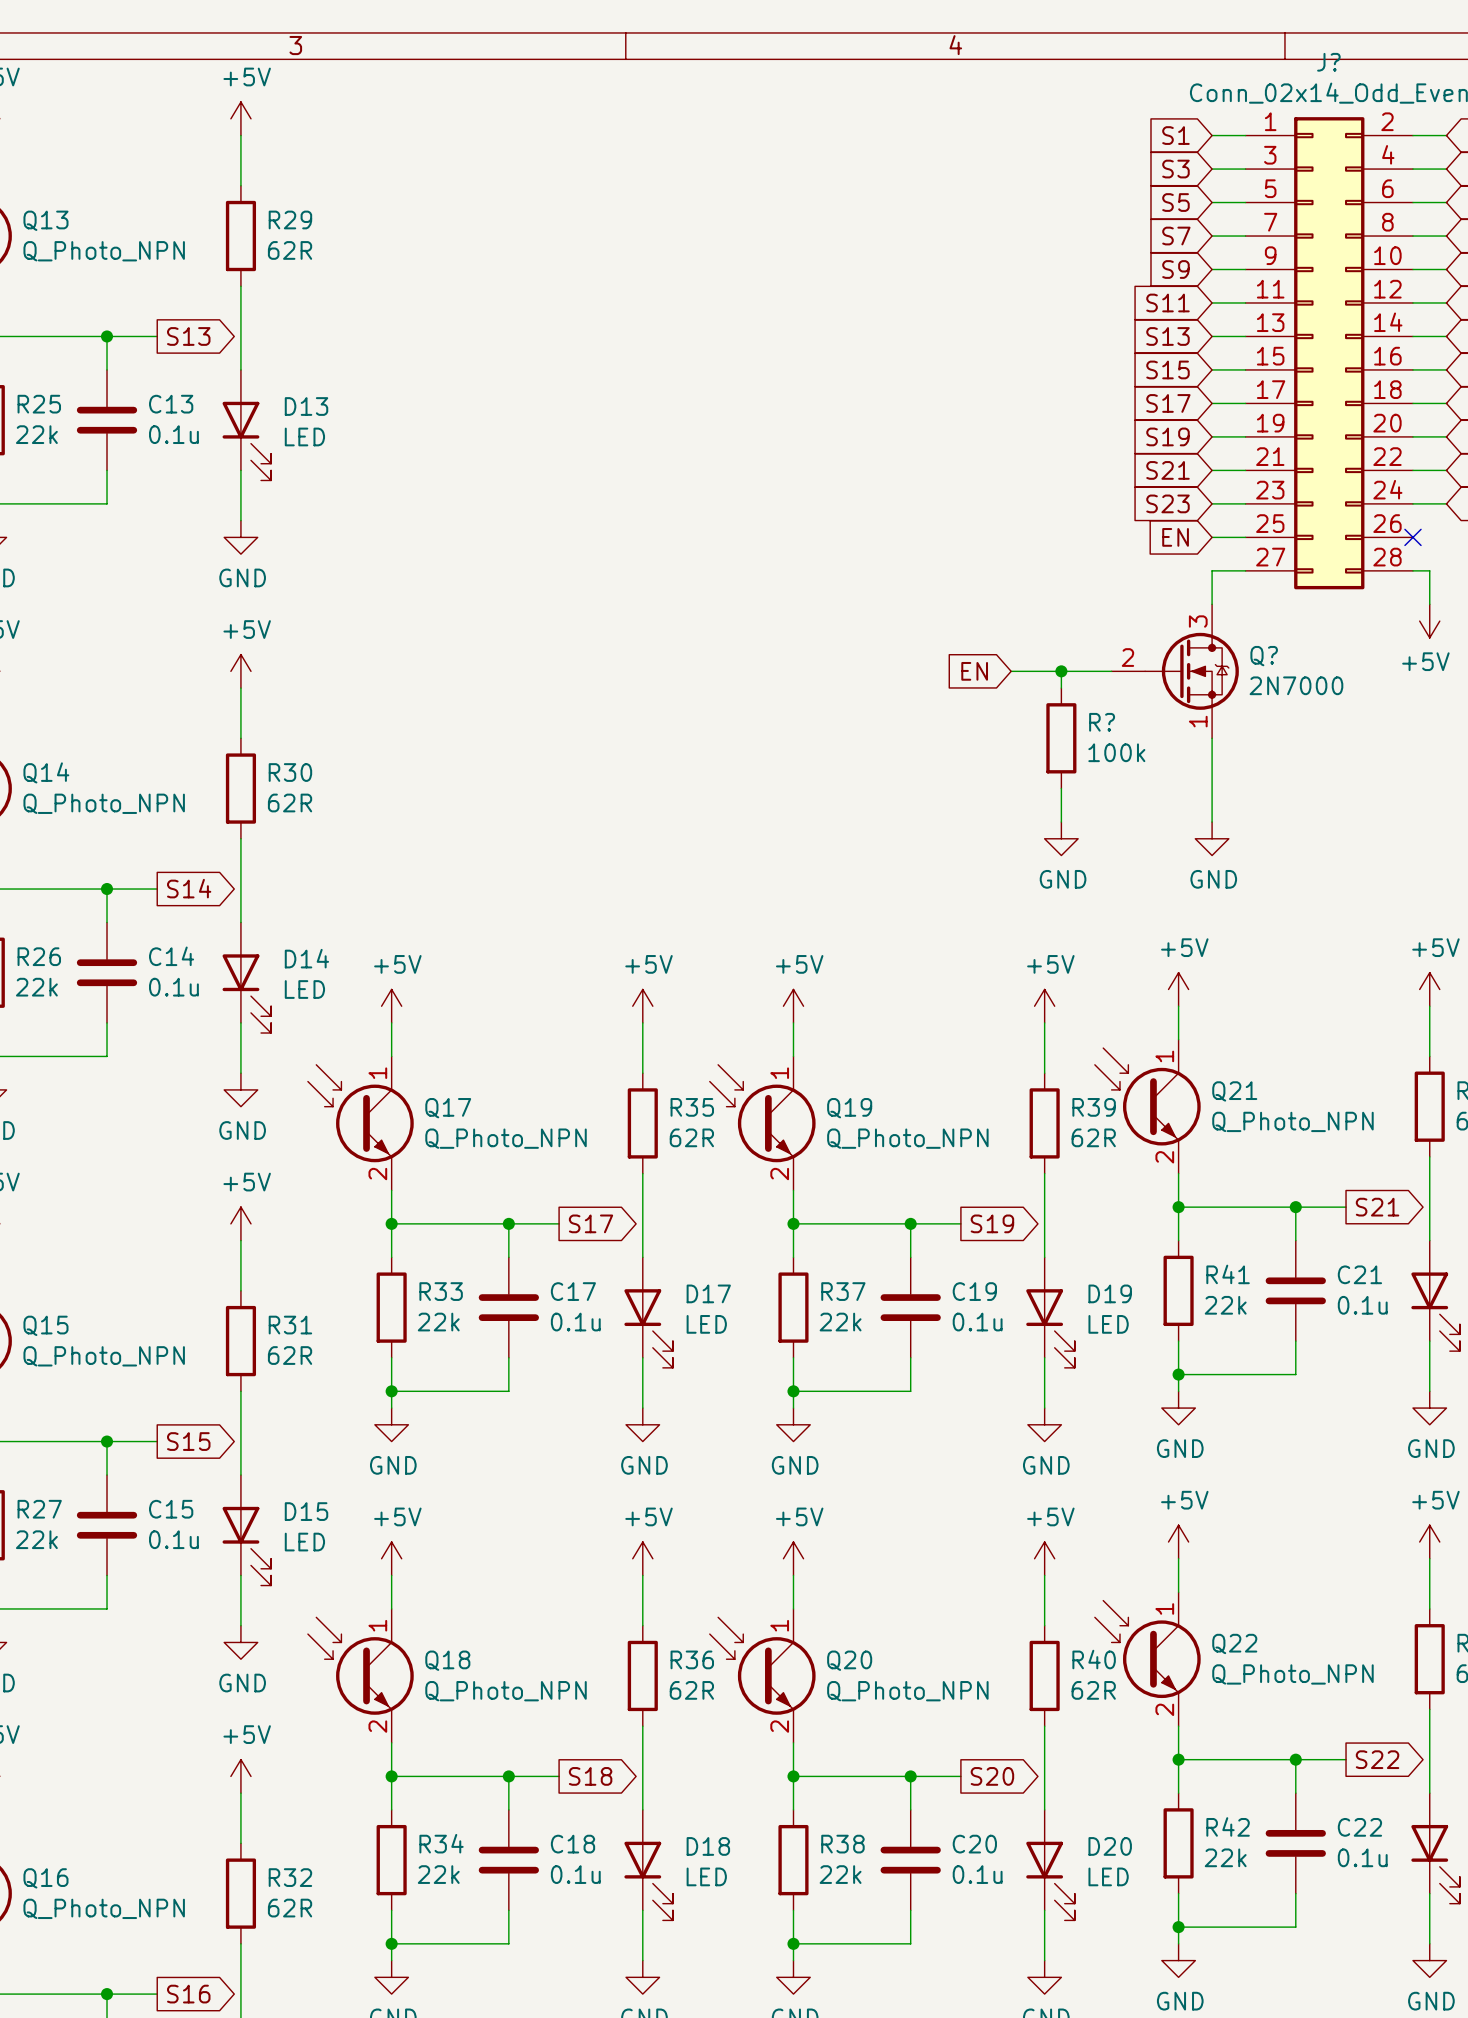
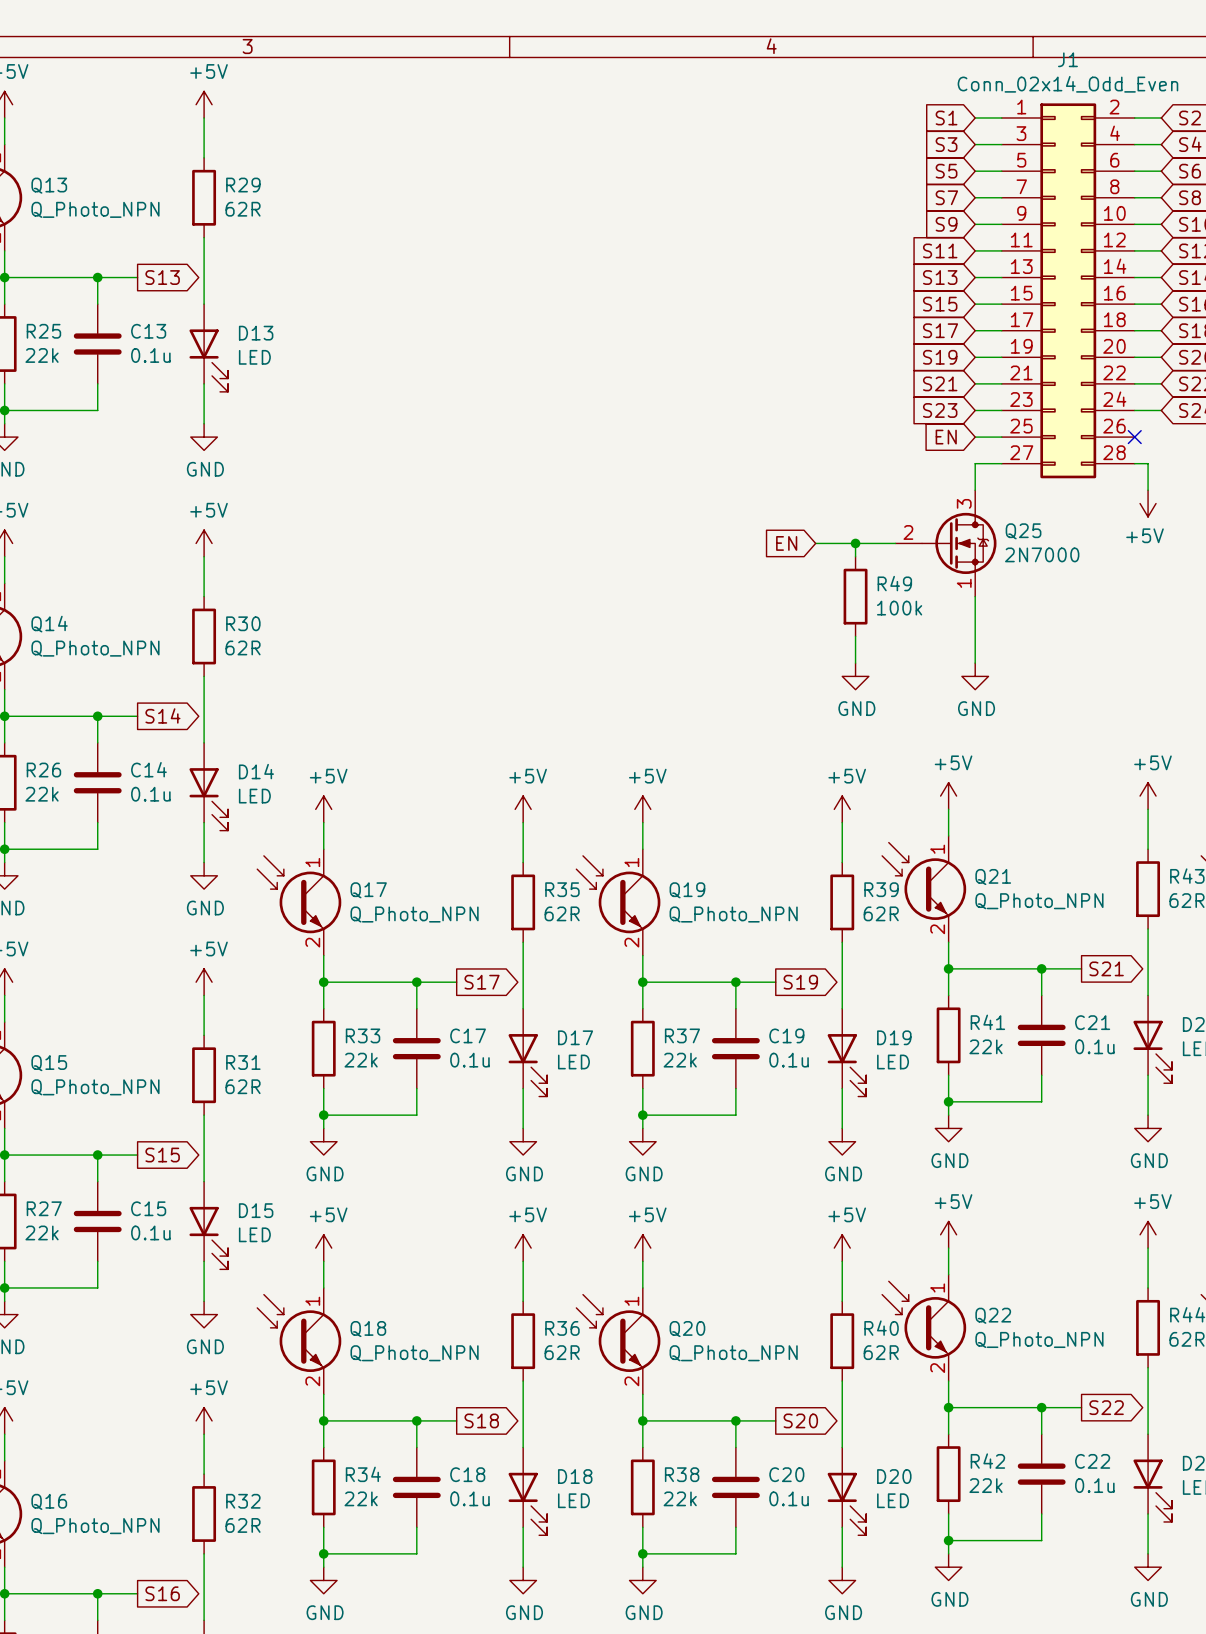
J? name: J? (1328, 62) -> J1 (1067, 59)
Q? name: Q? (1264, 656) -> Q25 (1023, 531)
R? name: R? (1102, 722) -> R49 (894, 583)

